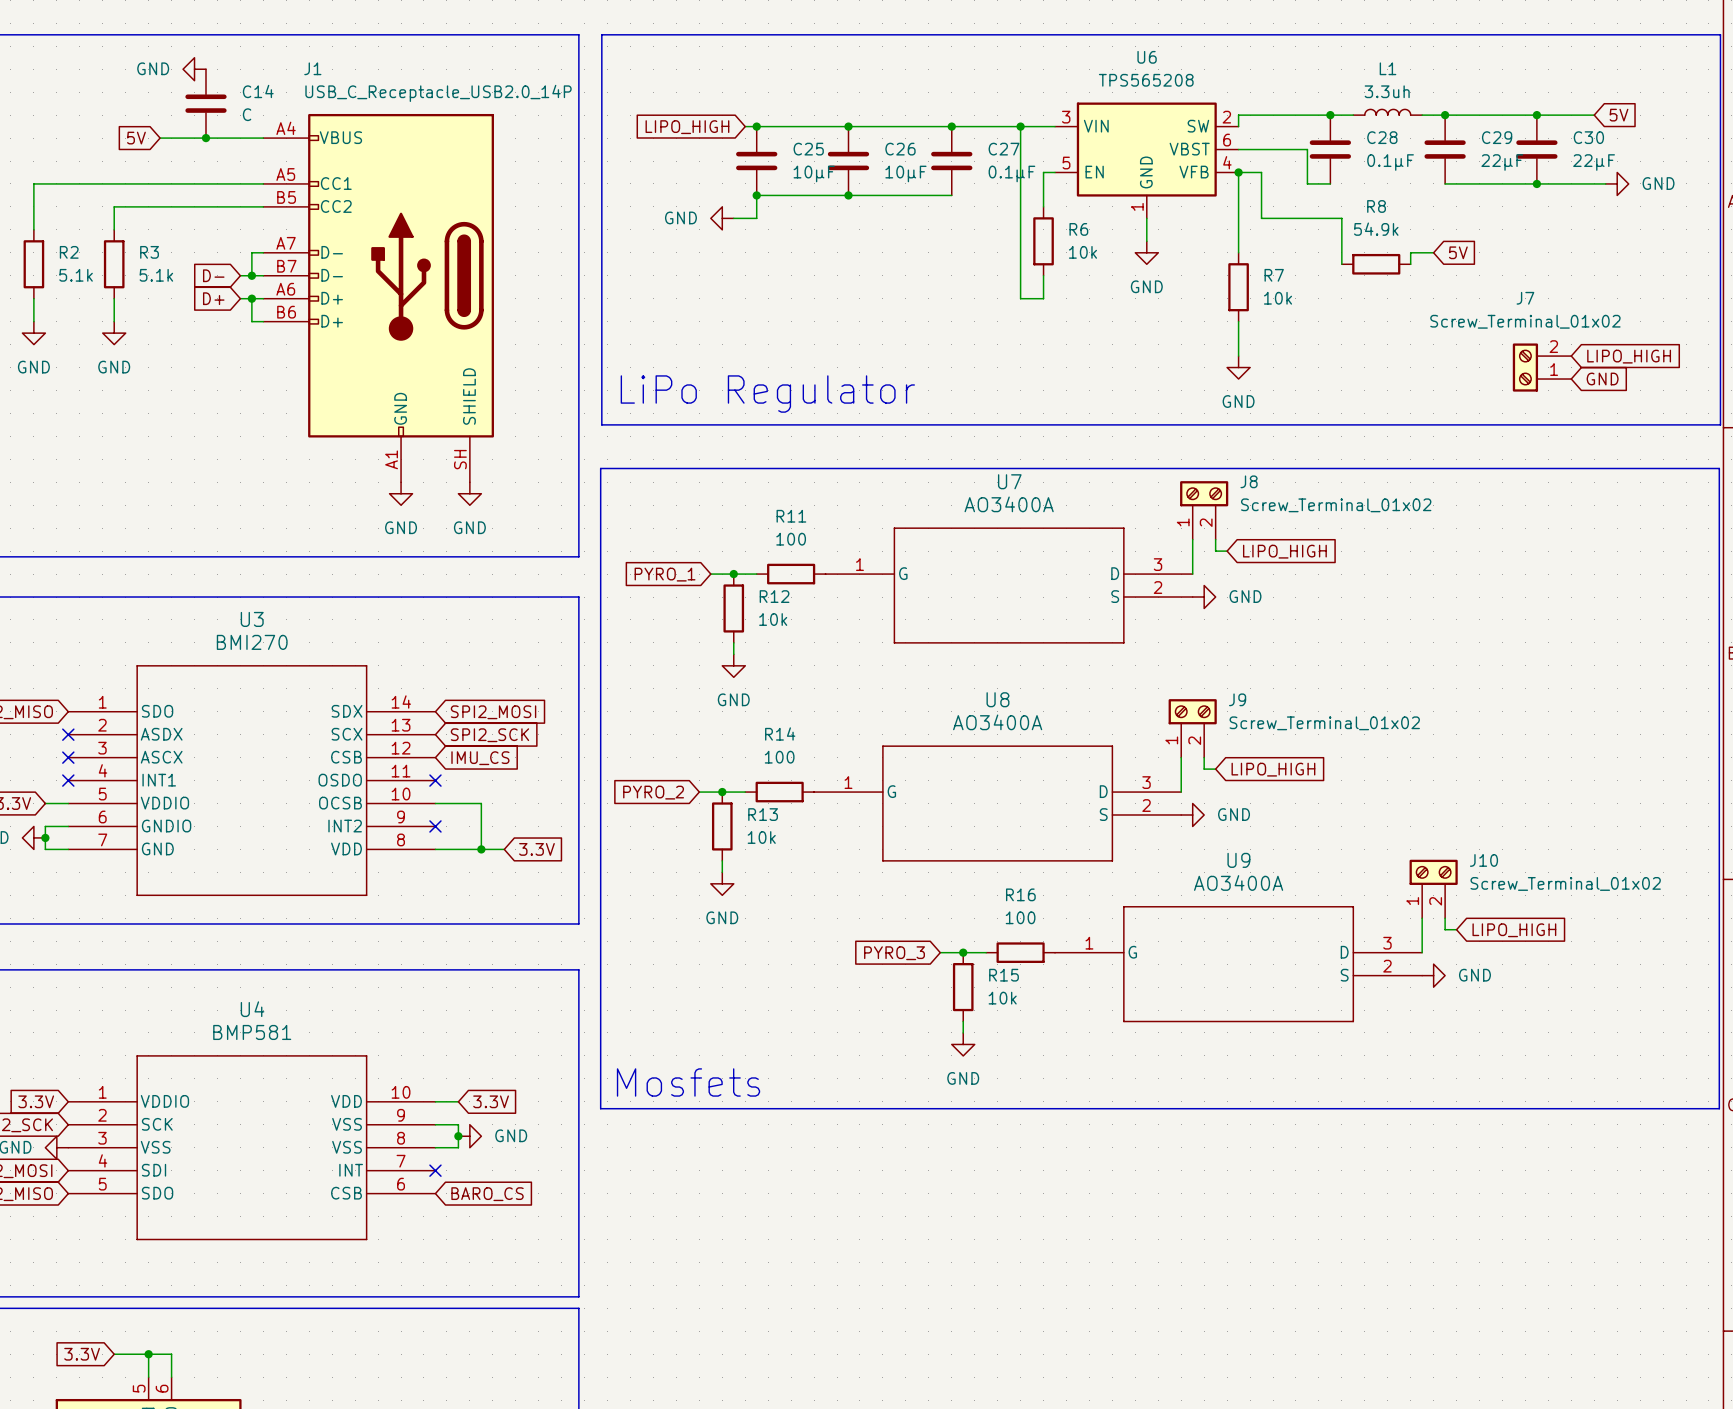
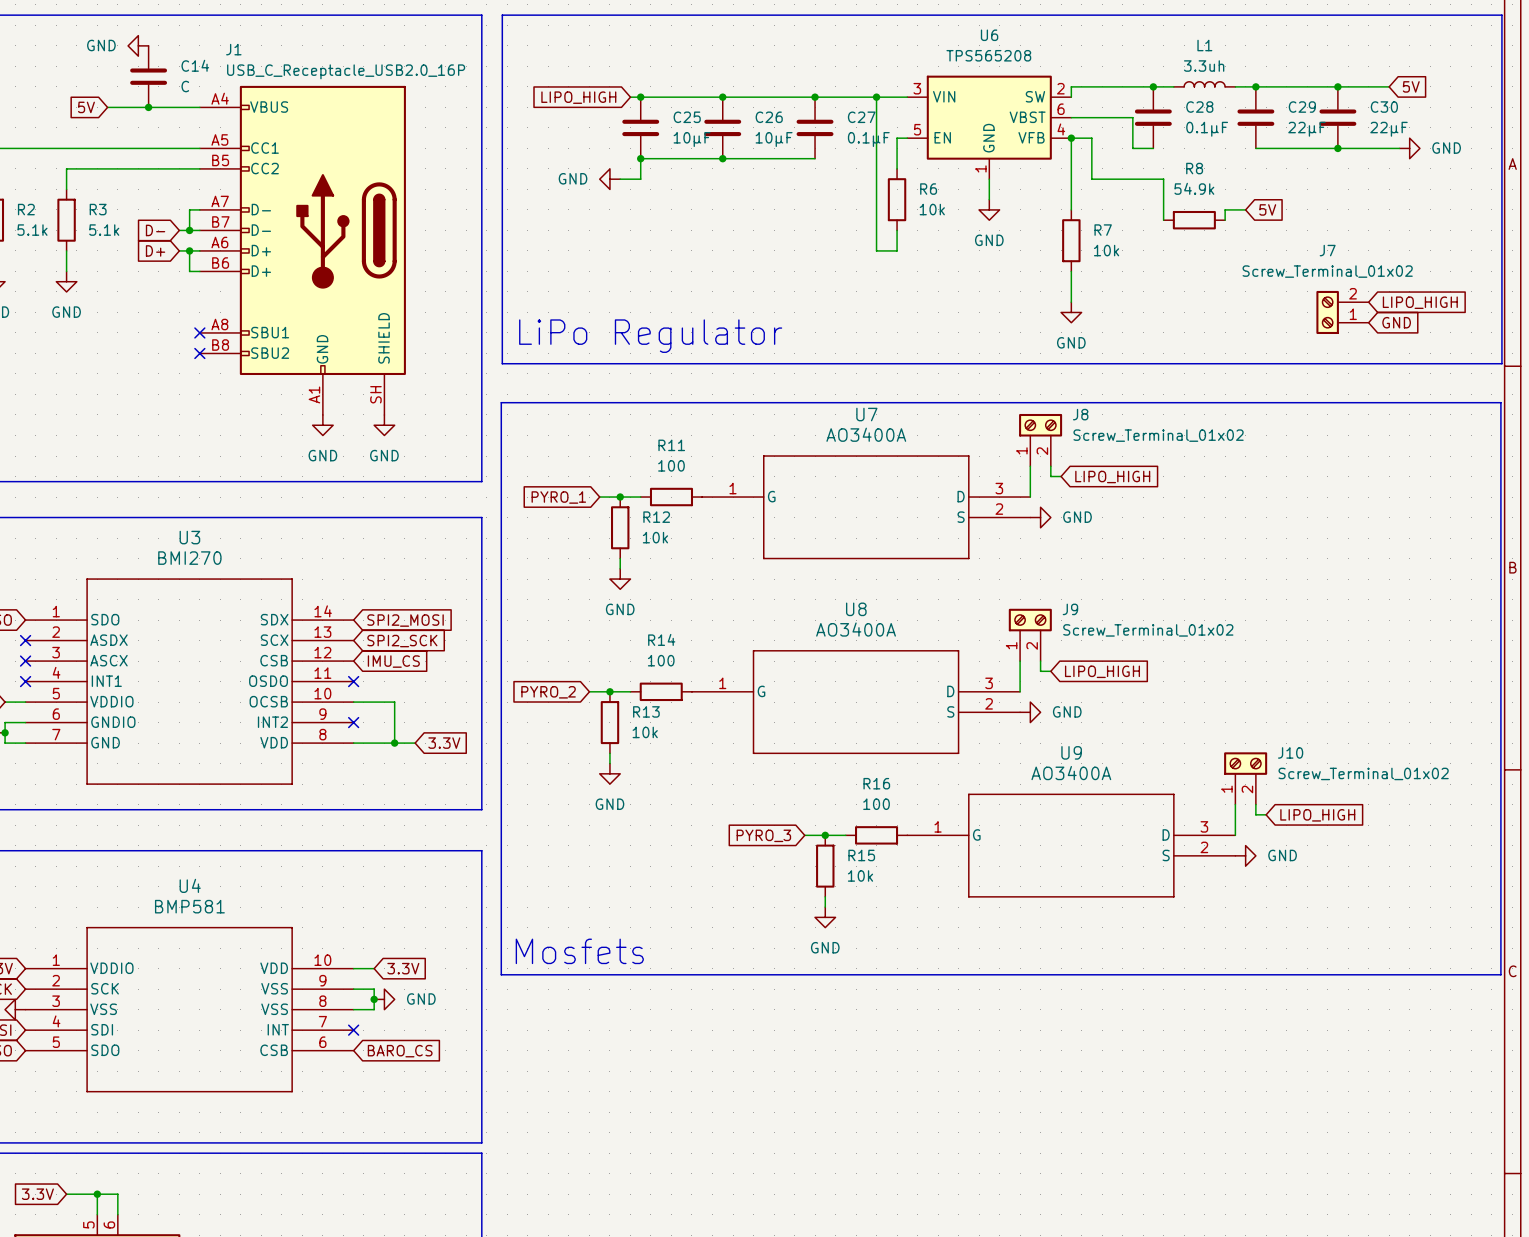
J1 value: USB_C_Receptacle_USB2.0_14P (438, 93) -> USB_C_Receptacle_USB2.0_16P (346, 71)
J1 symbol: [263, 113, 494, 483] -> [199, 85, 406, 415]
no-connect mark: none -> (199, 332)
no-connect mark: none -> (199, 353)

